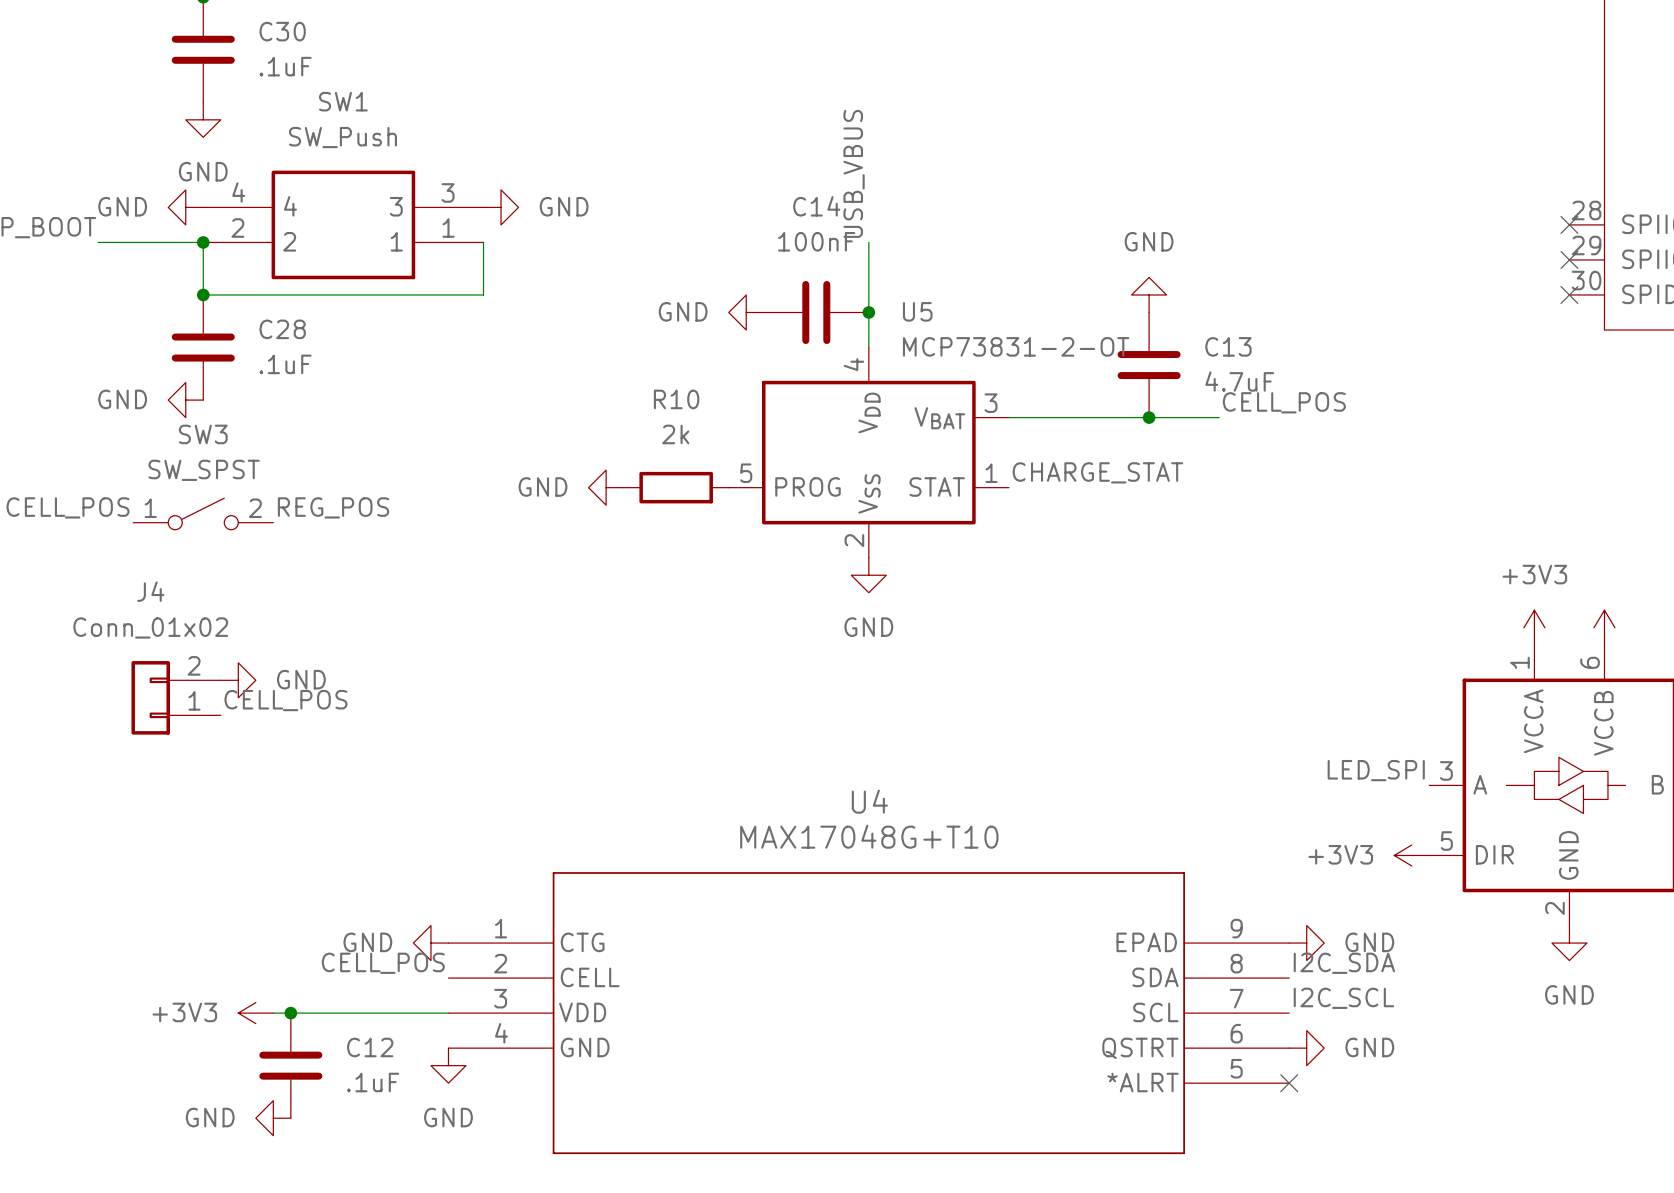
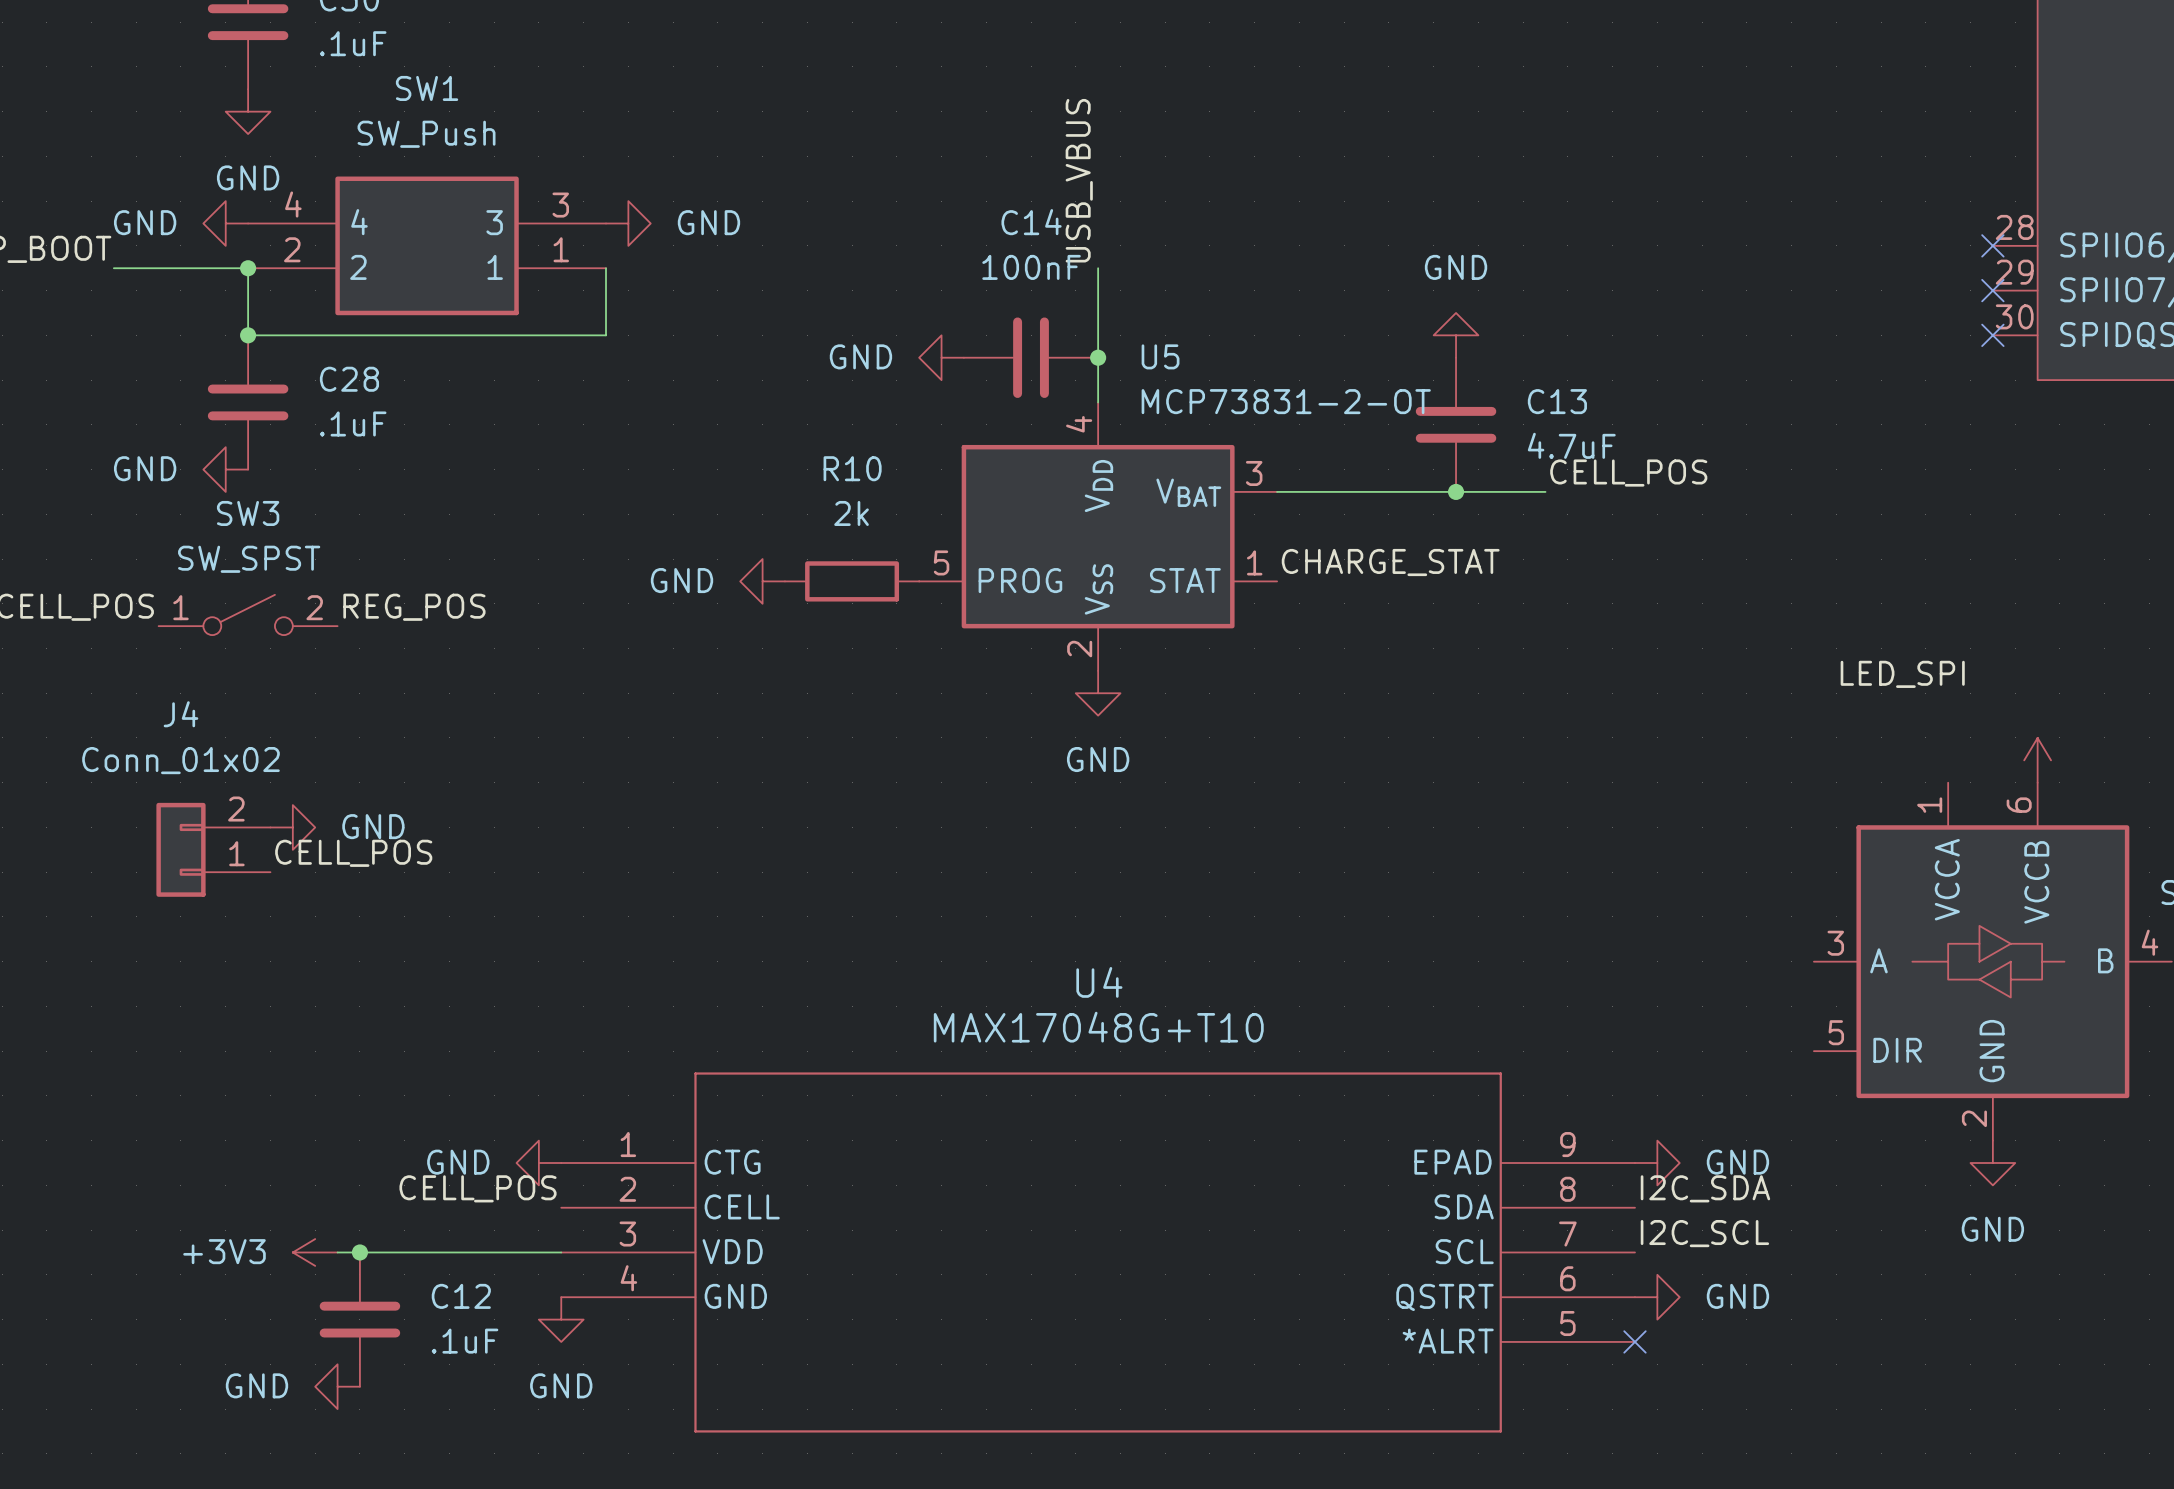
power symbol: +3V3 (1534, 627) -> none
label position: LED_SPI (1376, 770) -> LED_SPI (1902, 674)
power symbol: +3V3 (1411, 855) -> none

